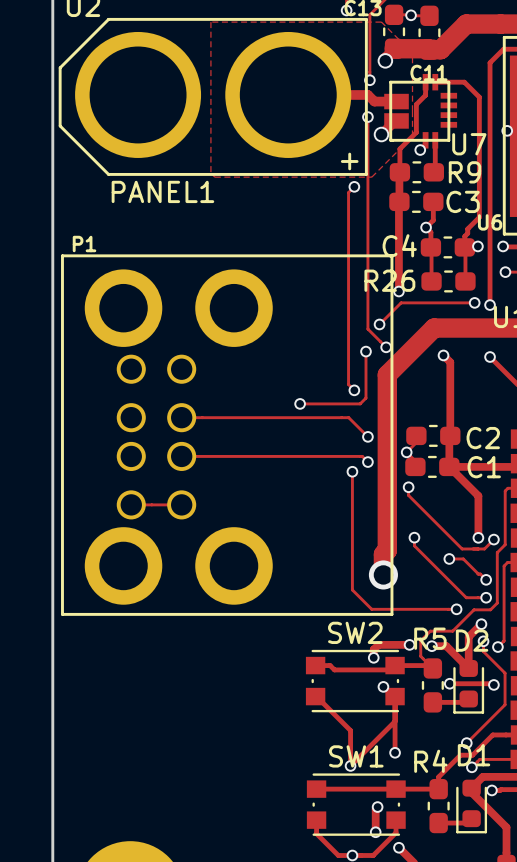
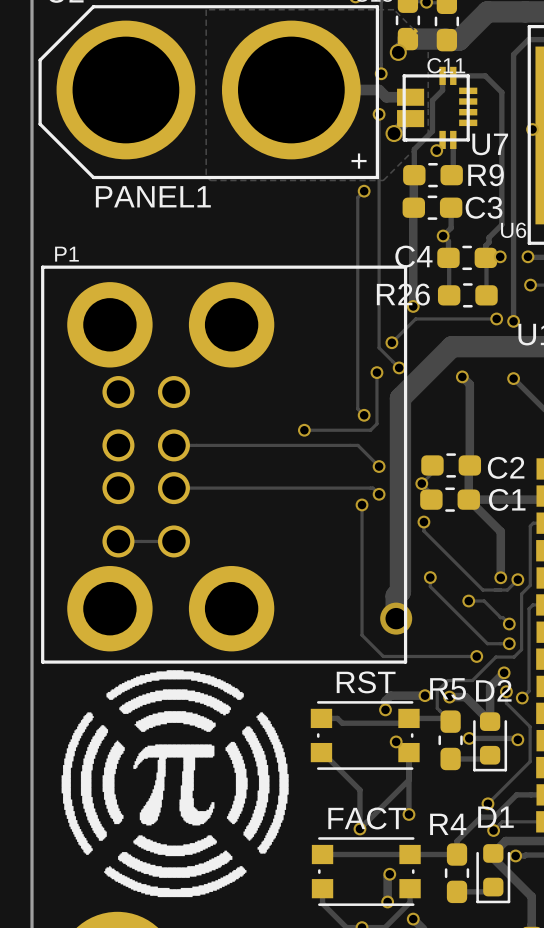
drawing: none -> [61, 670, 289, 898]
SW2 name: SW2 (355, 632) -> RST (366, 682)
SW1 name: SW1 (356, 756) -> FACT (367, 818)

